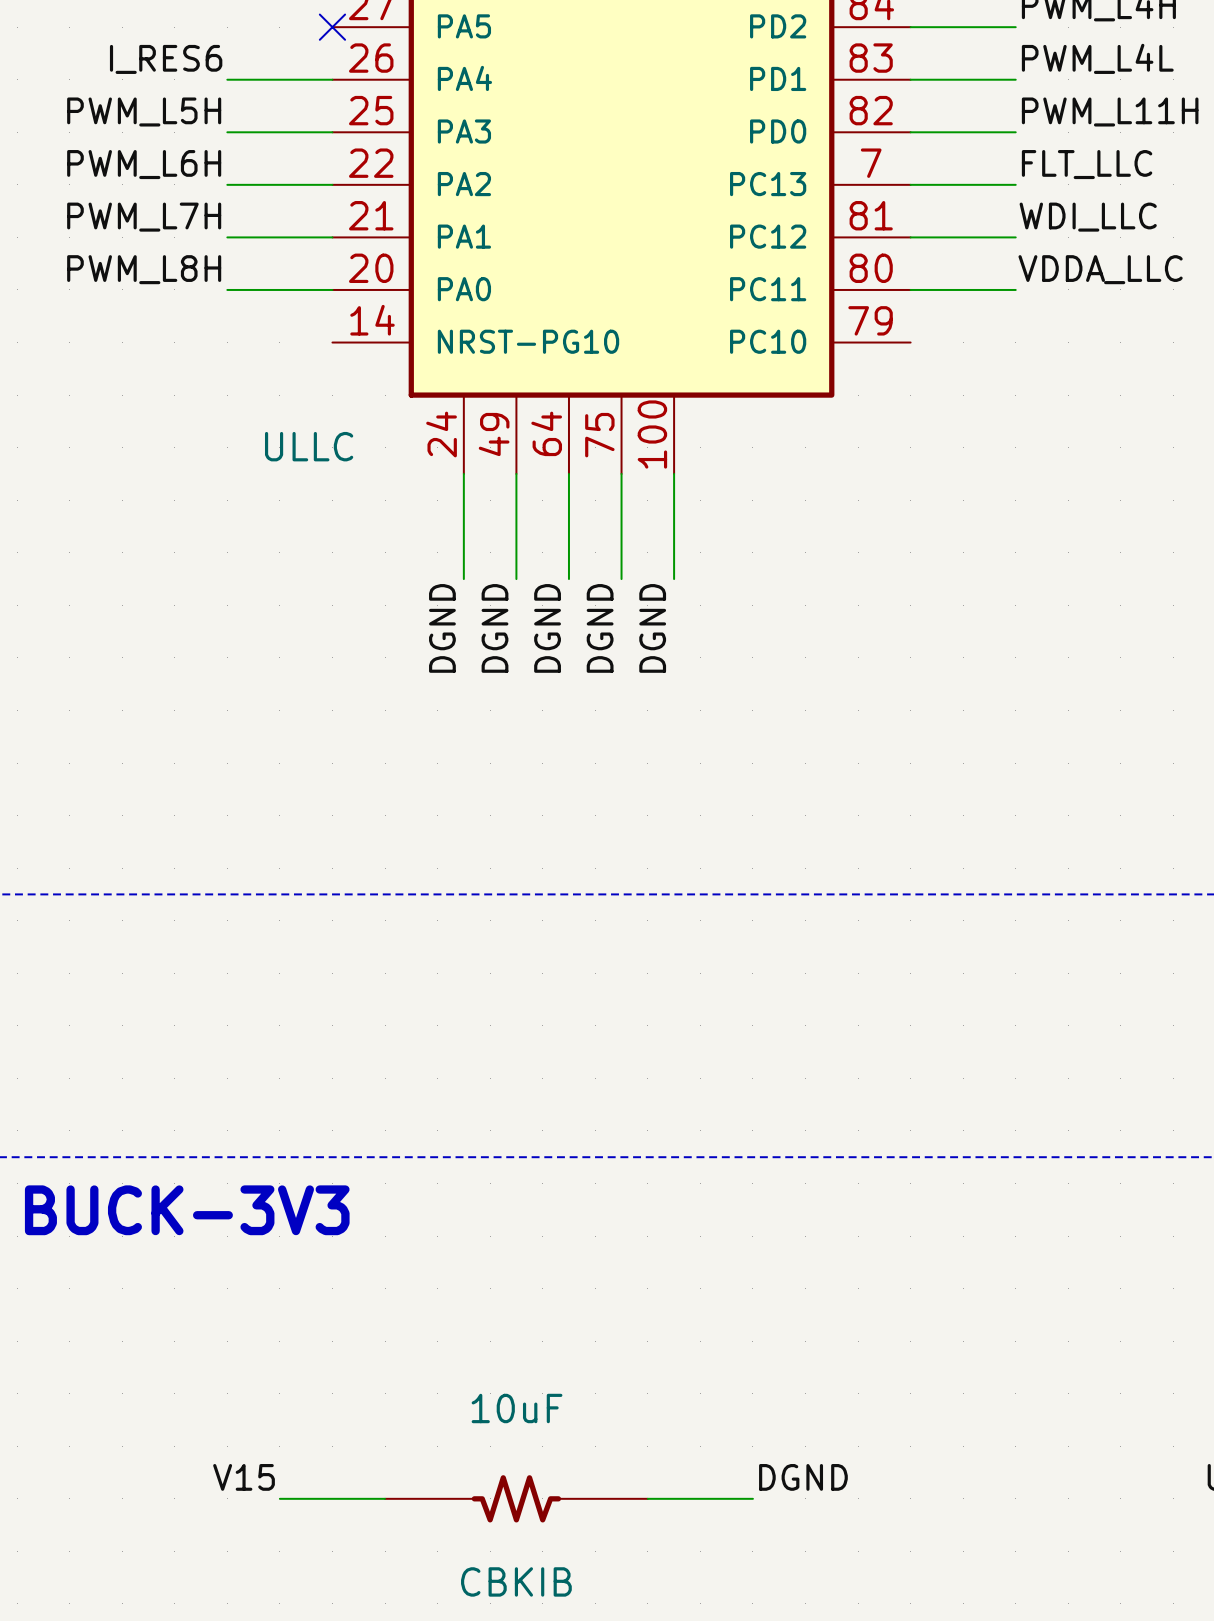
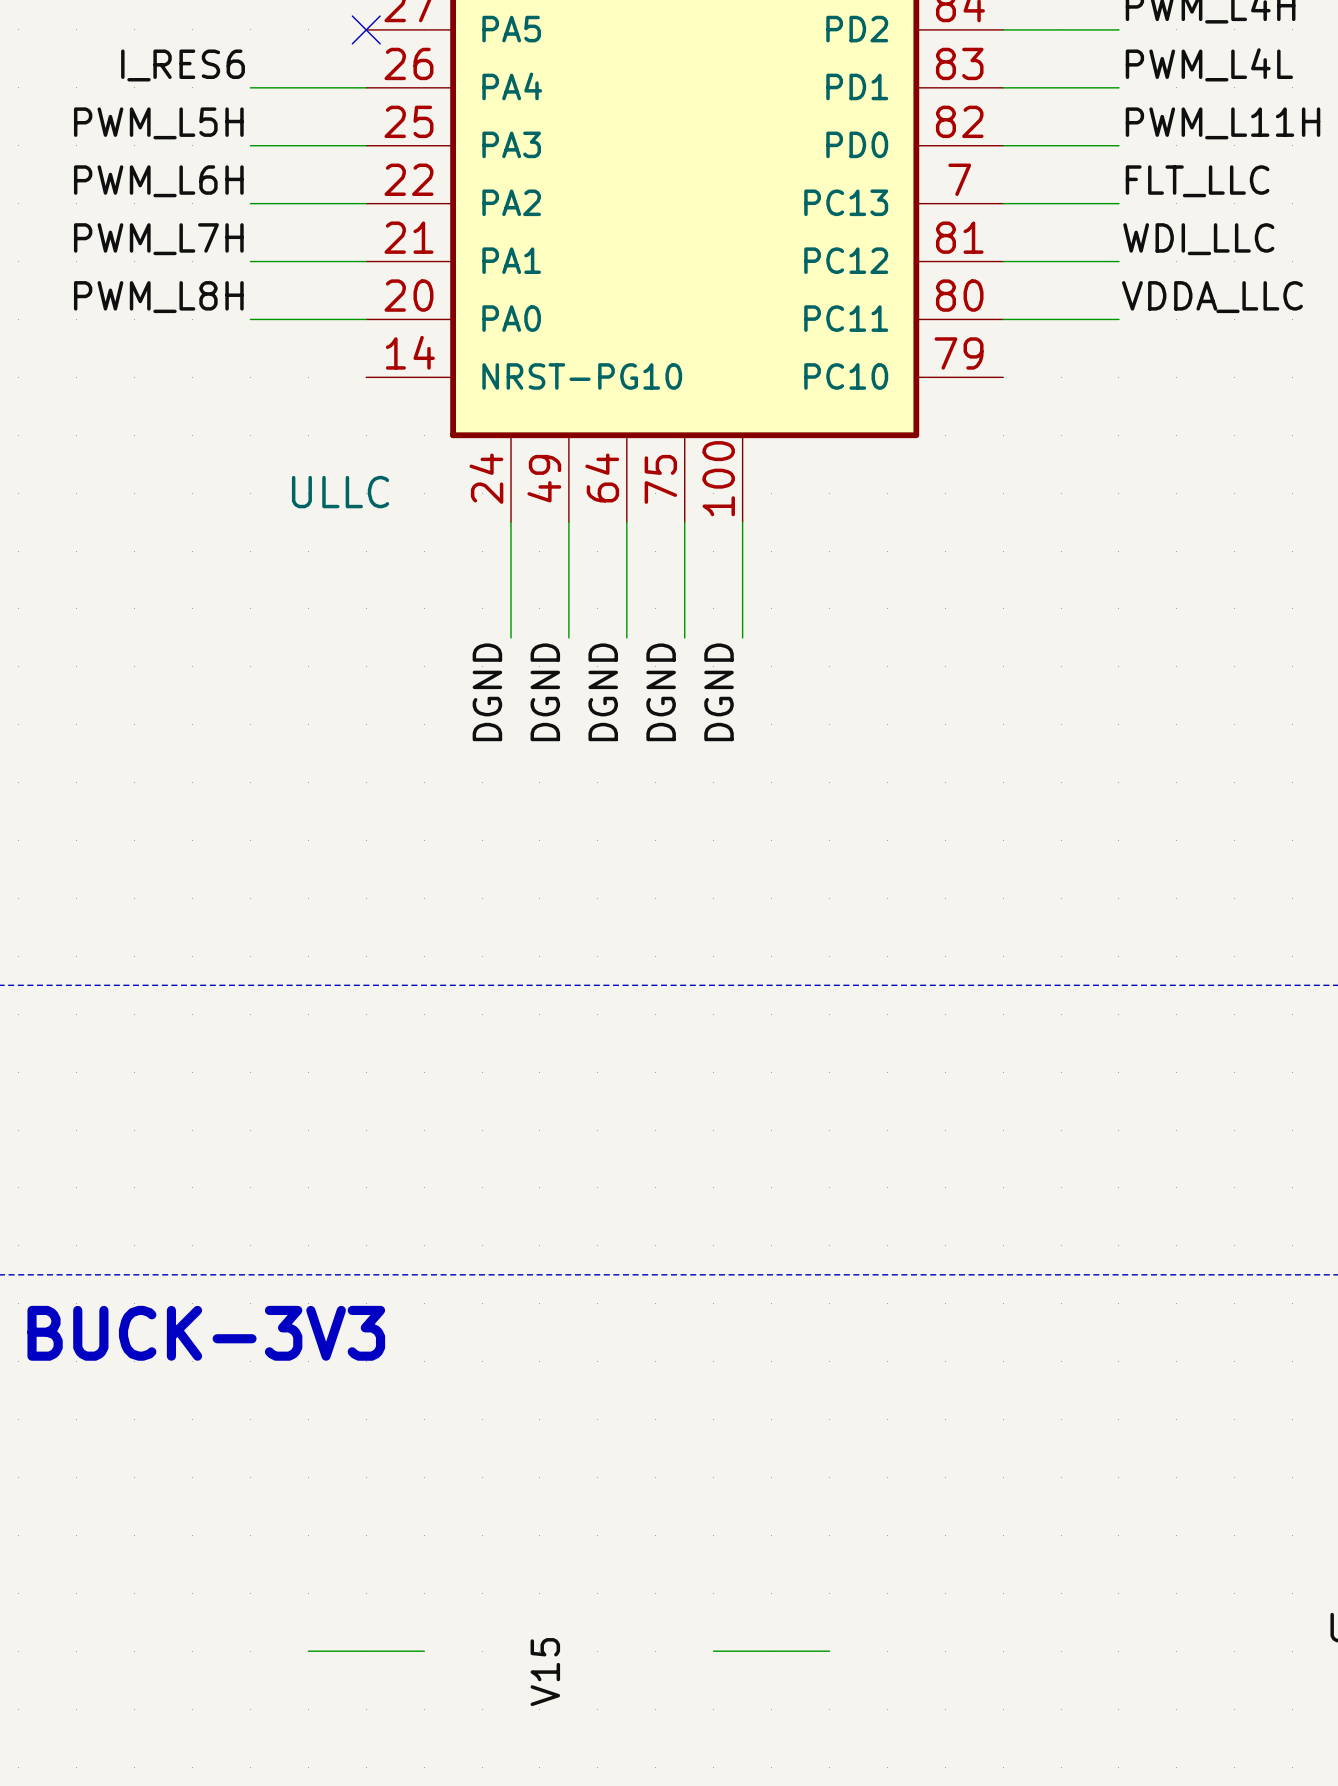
label: V15 (244, 1477) -> none
label: DGND (803, 1477) -> none
CBKIB: 10uF (516, 1498) -> none
label: none -> V15 (545, 1672)

